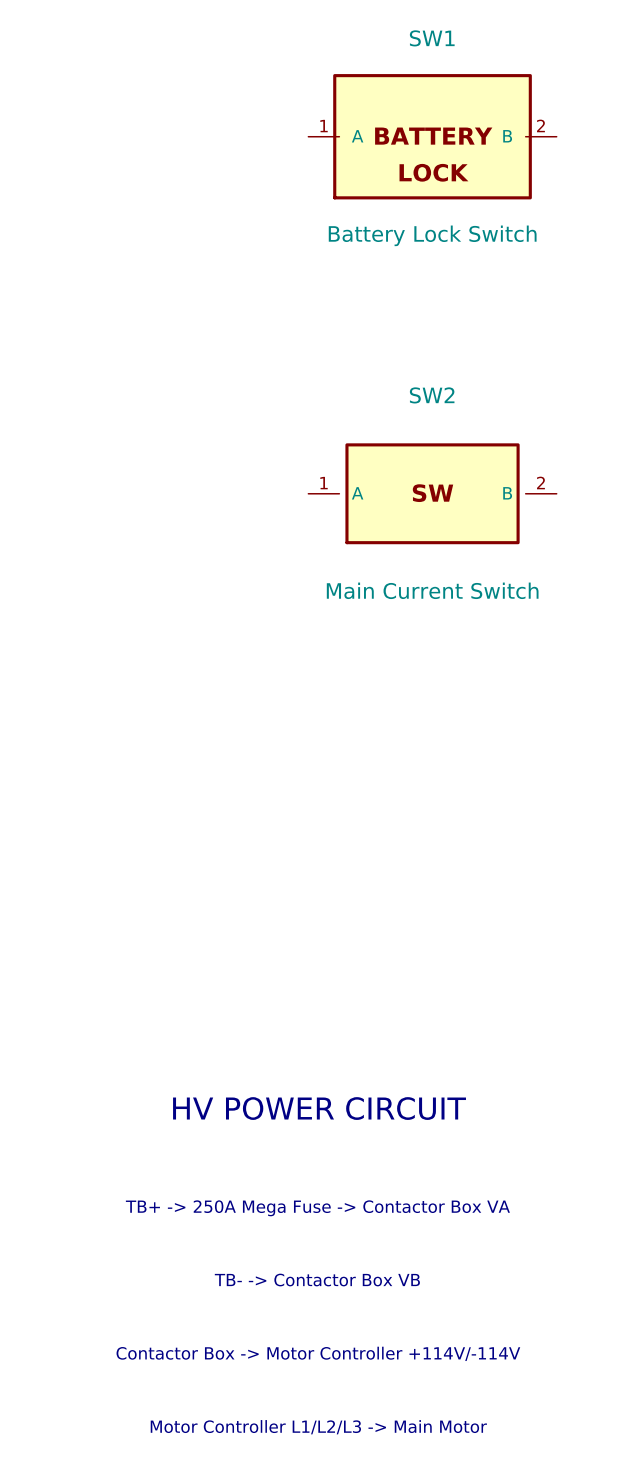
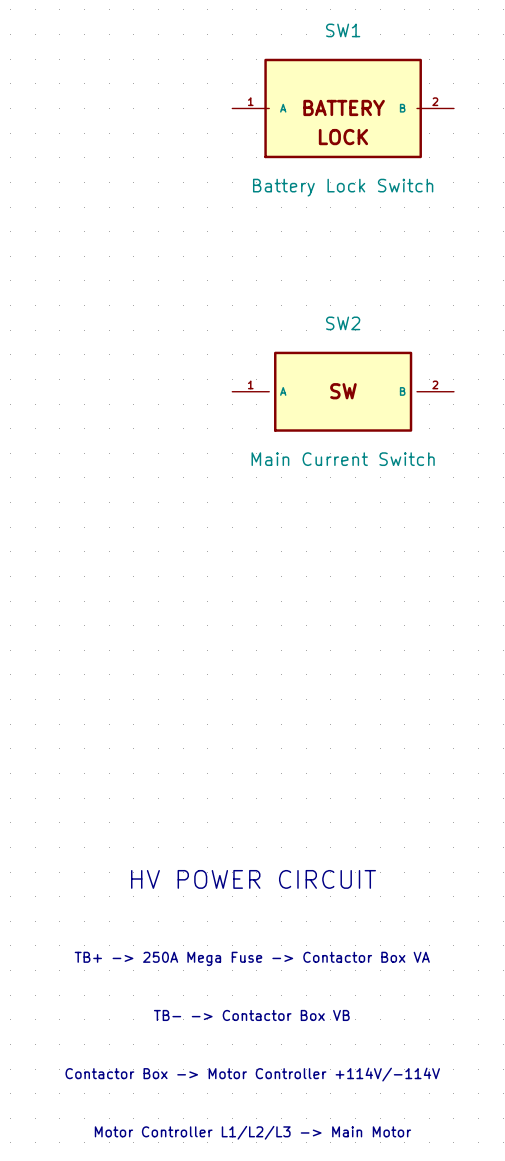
SW1 symbol: [308, 74, 557, 200] -> [232, 58, 454, 159]
SW2 symbol: [308, 443, 557, 545] -> [232, 351, 454, 432]

